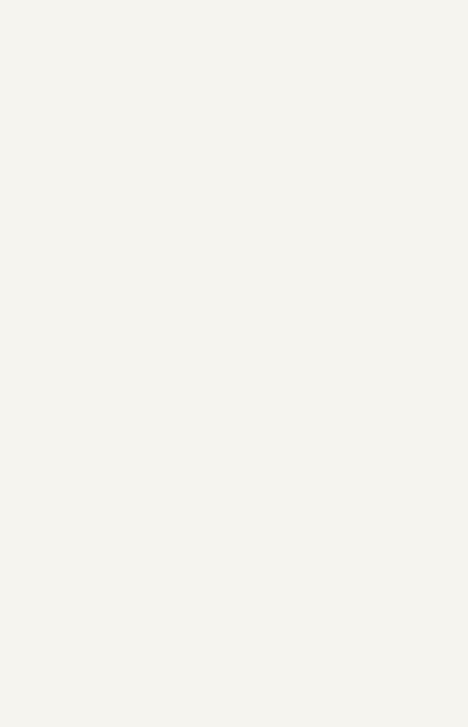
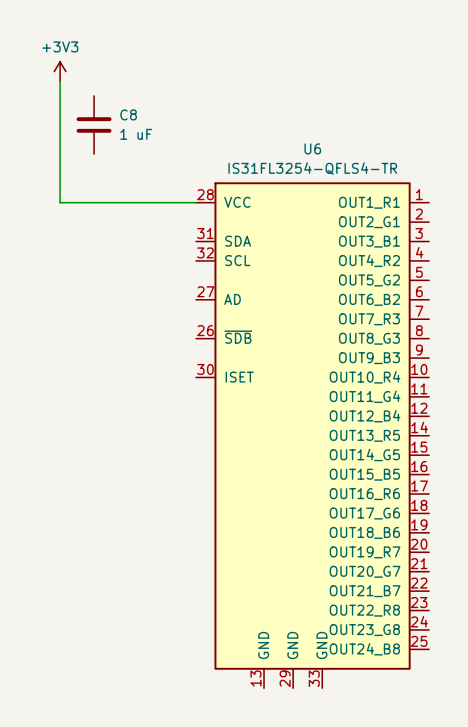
power symbol: none -> +3V3 (60, 71)
wire: none -> (60, 81) (60, 202) (196, 202)
C8: none -> 1 uF (94, 124)
U6: none -> IS31FL3254-QFLS4-TR (312, 435)

